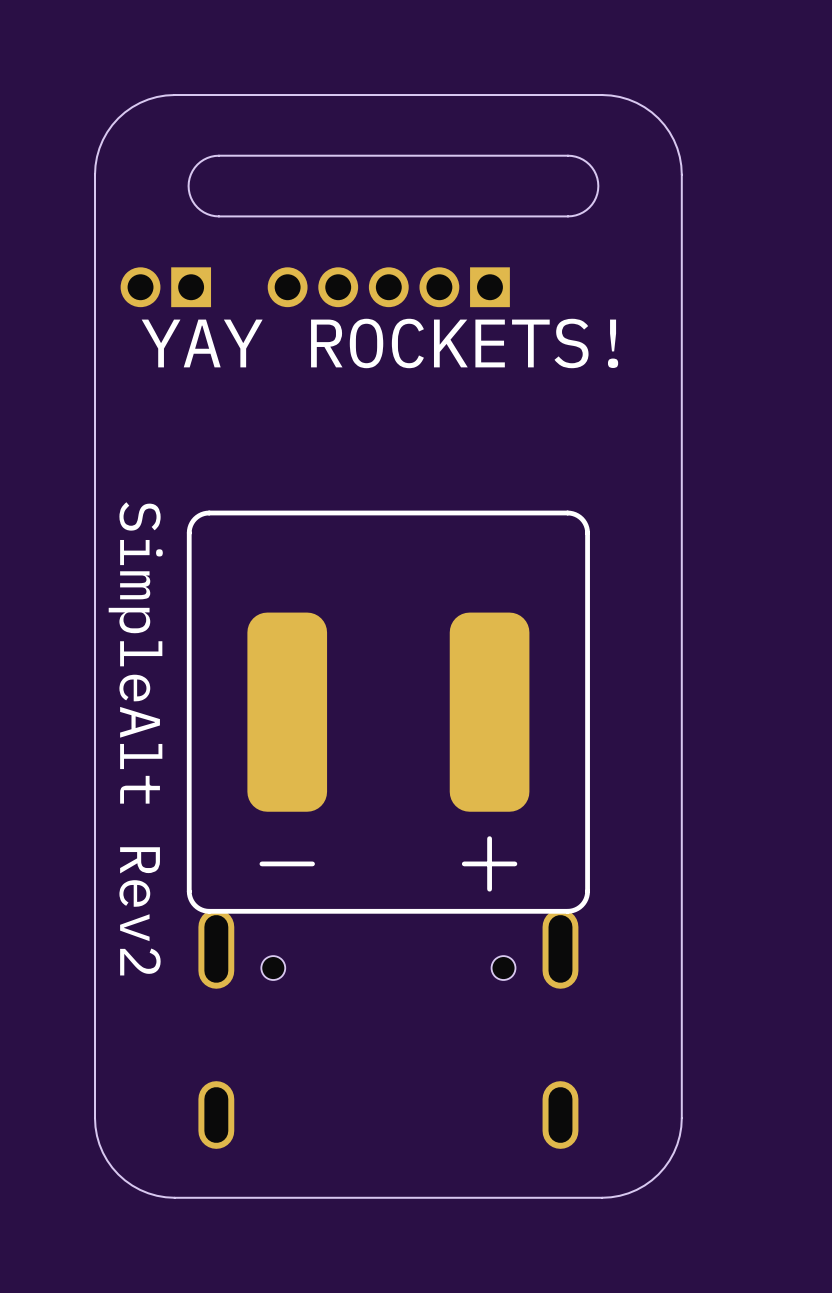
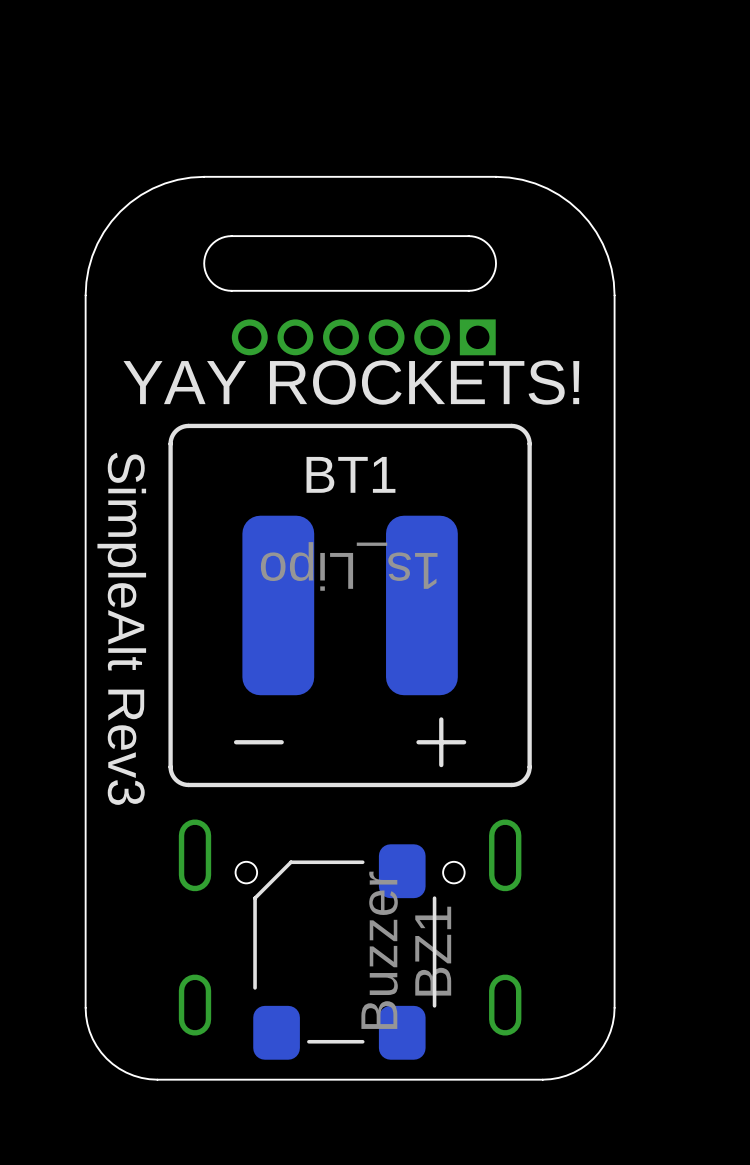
board edge: (567, 155) (214, 155) (203, 159) (194, 167) (189, 178) (188, 190) (192, 201) (197, 207) (207, 214) (214, 216) (571, 216) (583, 212) (589, 207) (596, 197) (598, 186) (596, 174) (589, 164) (579, 158) (567, 155) -> none
board edge: none -> (468, 236) (228, 236) (216, 240) (209, 247) (204, 256) (204, 266) (207, 276) (213, 283) (228, 290) (471, 290) (481, 287) (489, 281) (494, 273) (496, 263) (494, 253) (489, 245) (481, 239) (468, 236)
part: (165, 287) -> none
part: (388, 287) -> none
board edge: (681, 327) (681, 174) (677, 148) (669, 132) (651, 112) (628, 99) (602, 95) (174, 95) (156, 97) (140, 102) (125, 112) (112, 125) (102, 140) (97, 156) (95, 174) (95, 327) -> (614, 295) (611, 269) (602, 243) (579, 211) (547, 188) (522, 179) (496, 176) (204, 176) (165, 183) (130, 202) (103, 232) (88, 269) (85, 295)
text position: YAY ROCKETS! (379, 343) -> YAY ROCKETS! (351, 382)
part: none -> (363, 337)
BT1: none -> 1s_Lipo (350, 605)
part: (388, 712) -> none
text: SimpleAlt Rev2 (135, 738) -> SimpleAlt Rev3 (121, 628)
BZ1: none -> Buzzer (344, 952)

